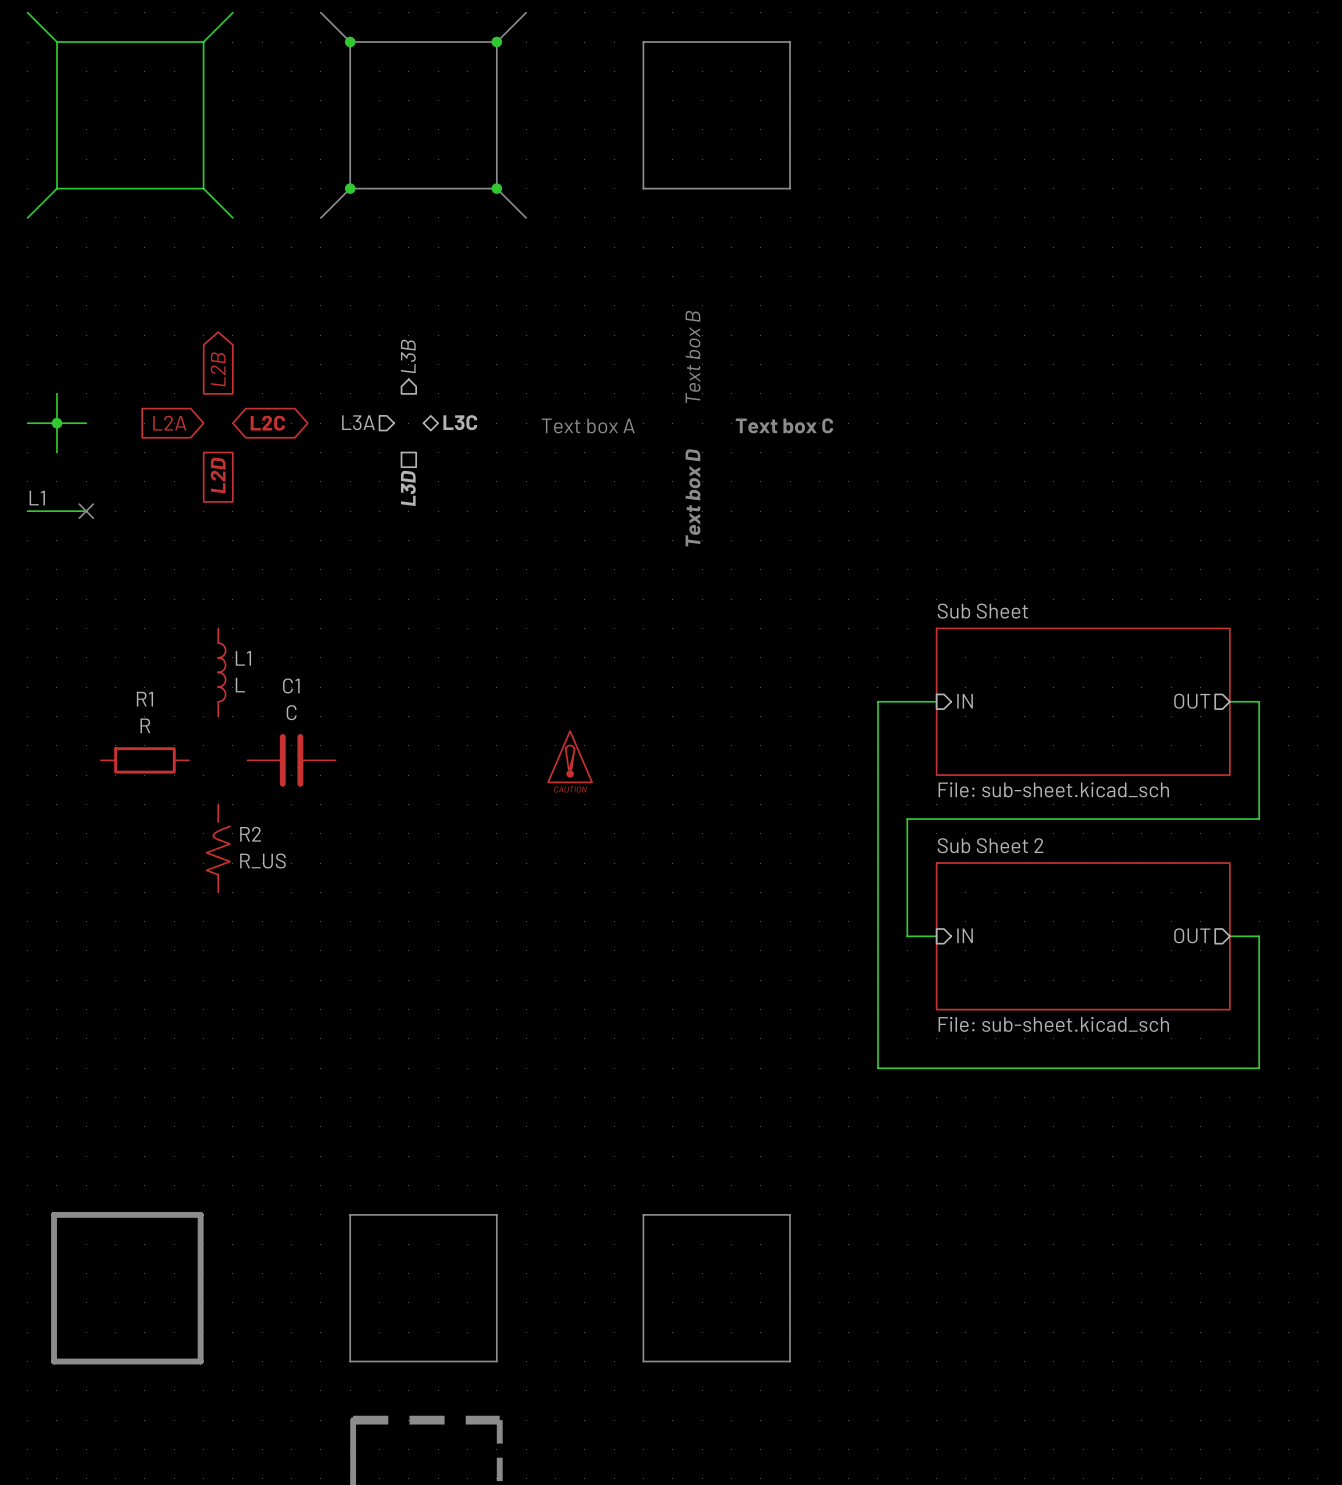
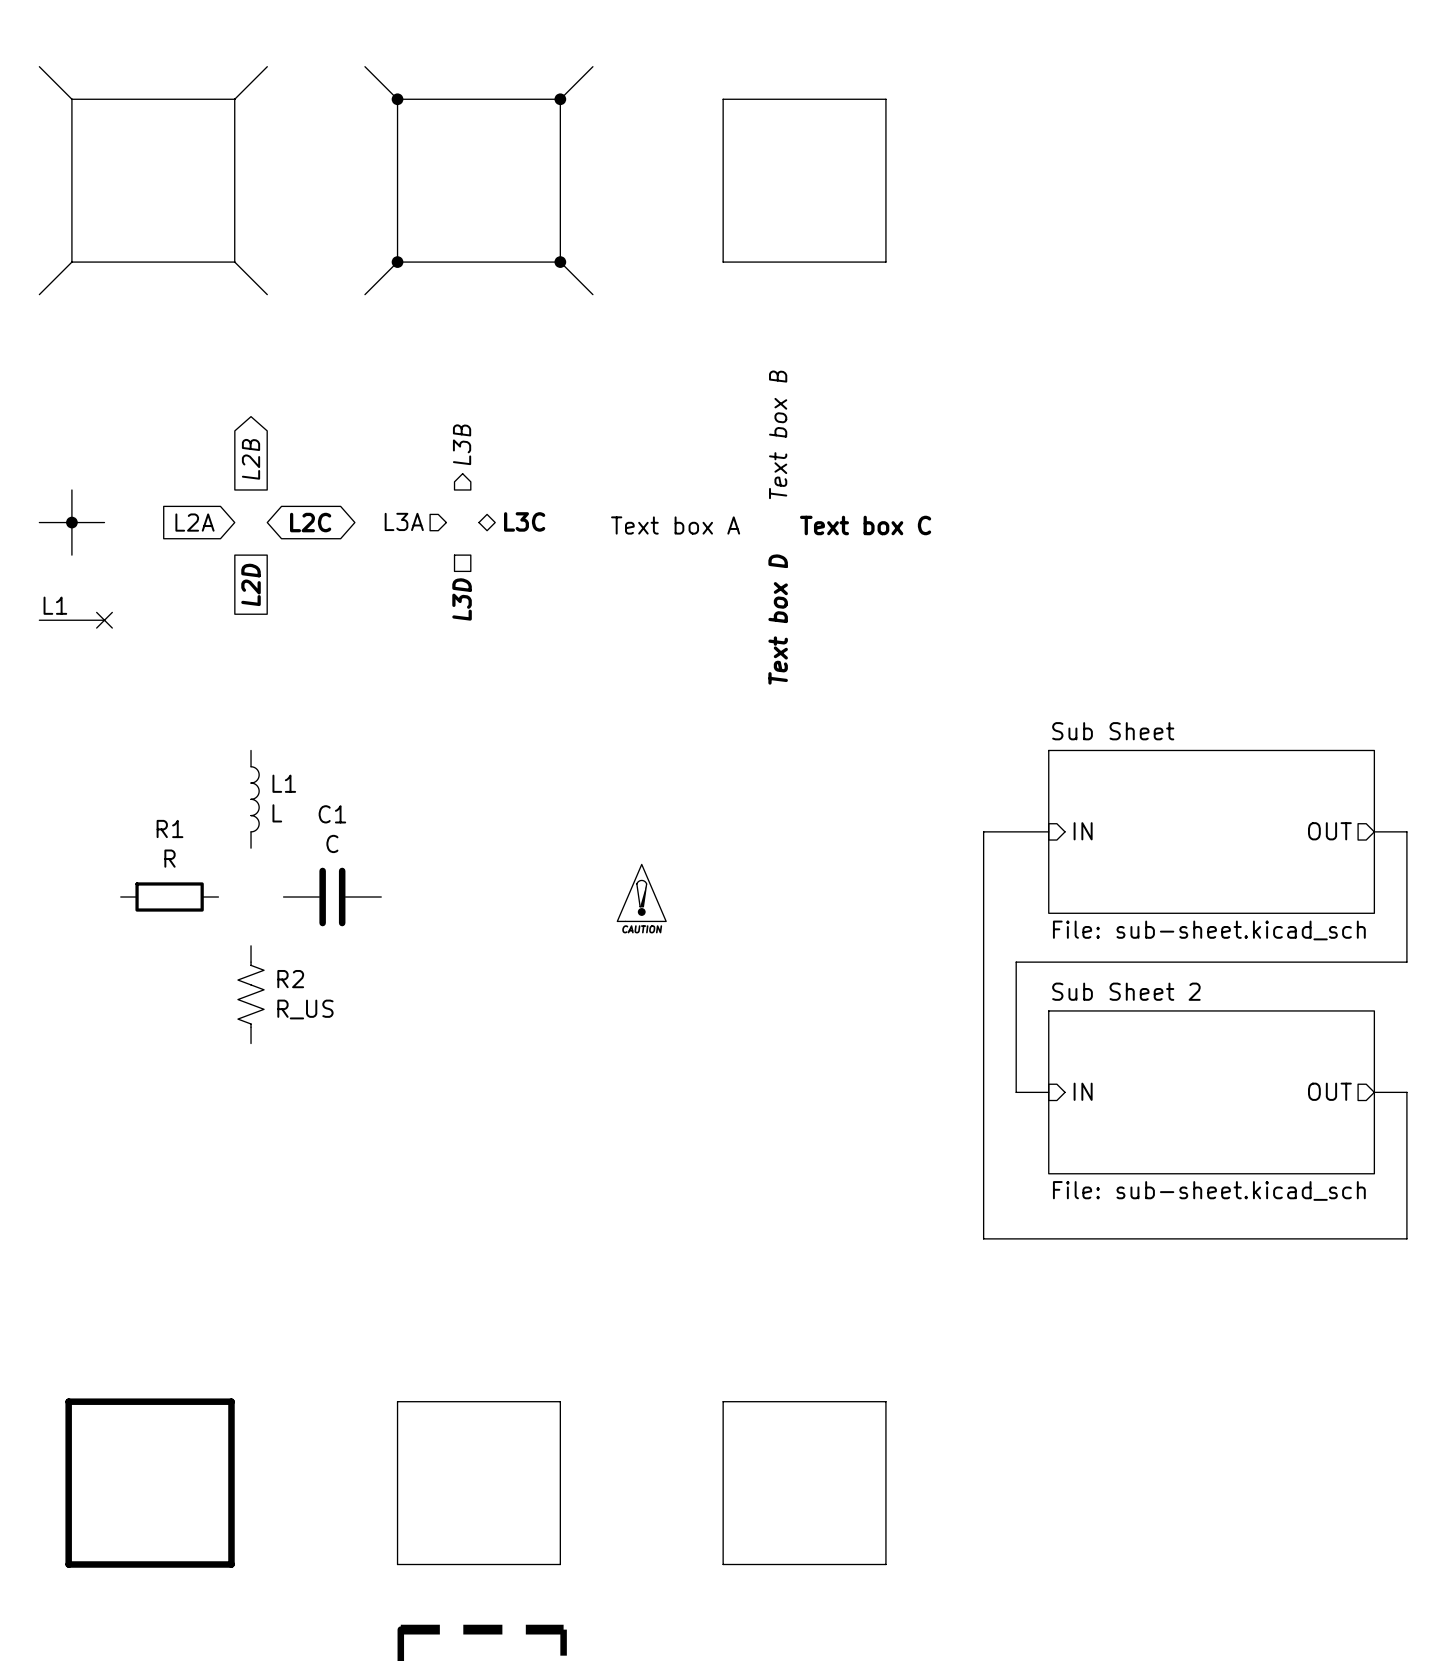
R2 symbol: [206, 804, 230, 893] -> [237, 945, 265, 1044]

